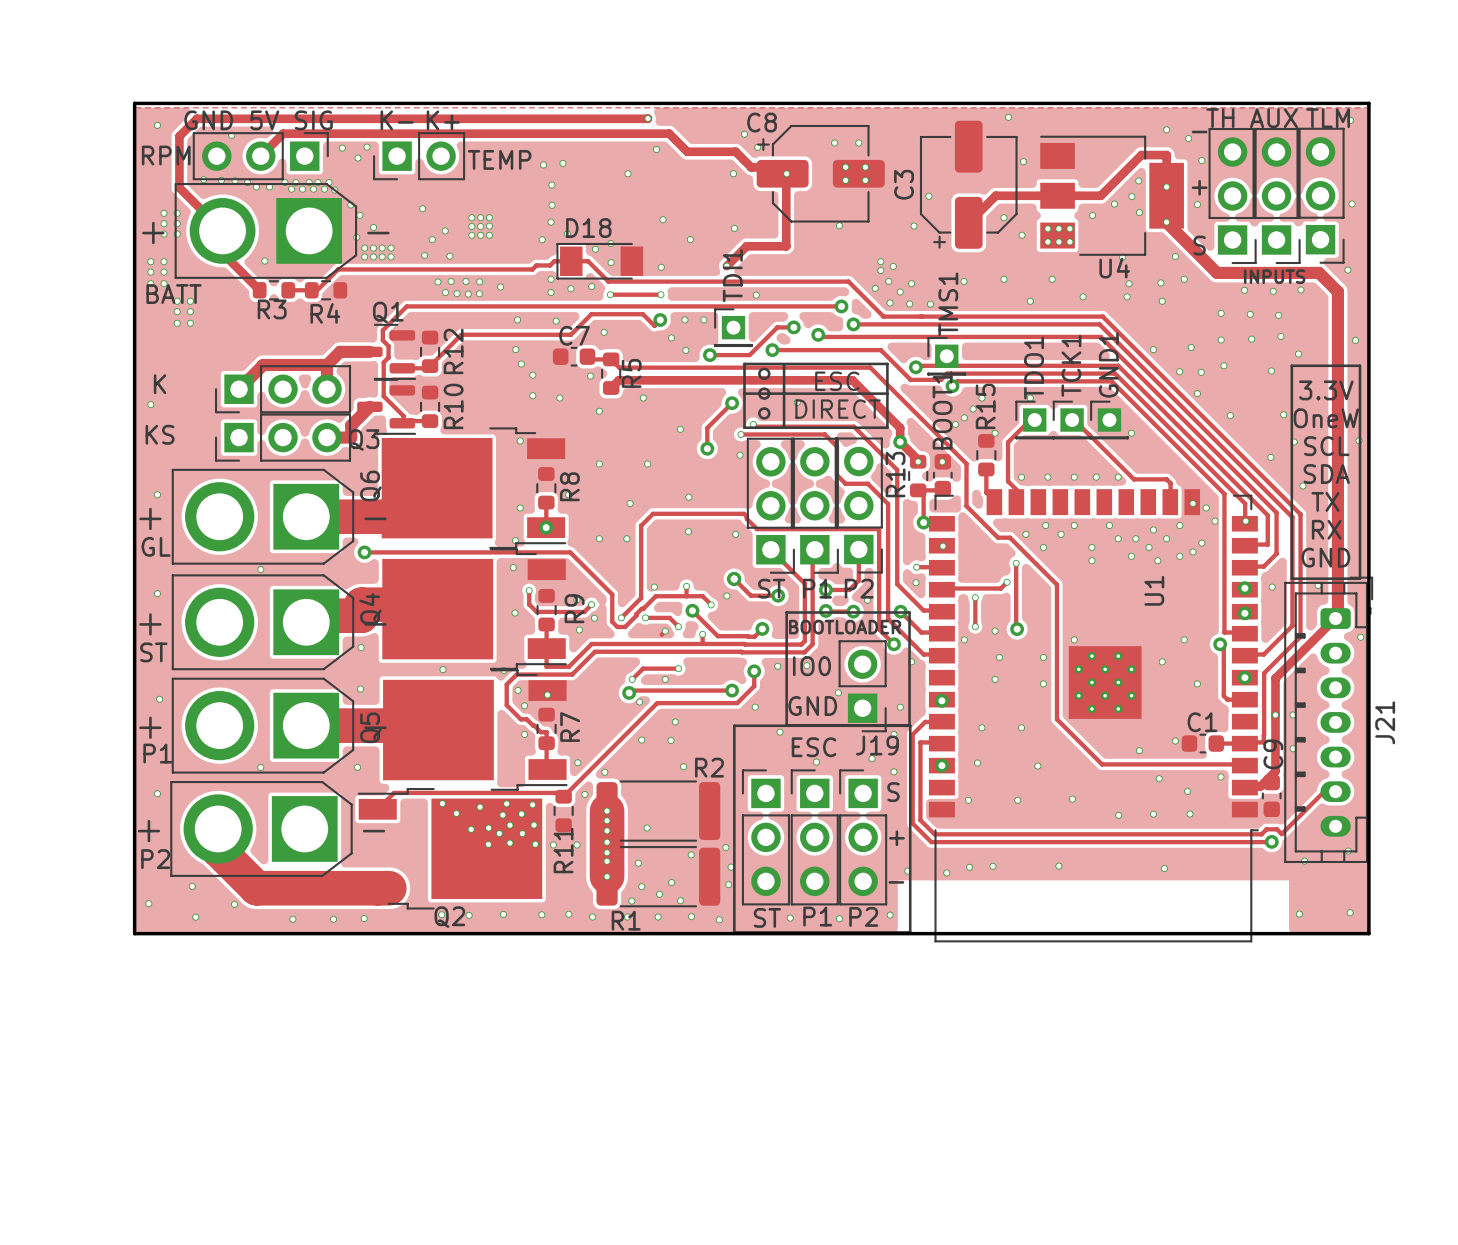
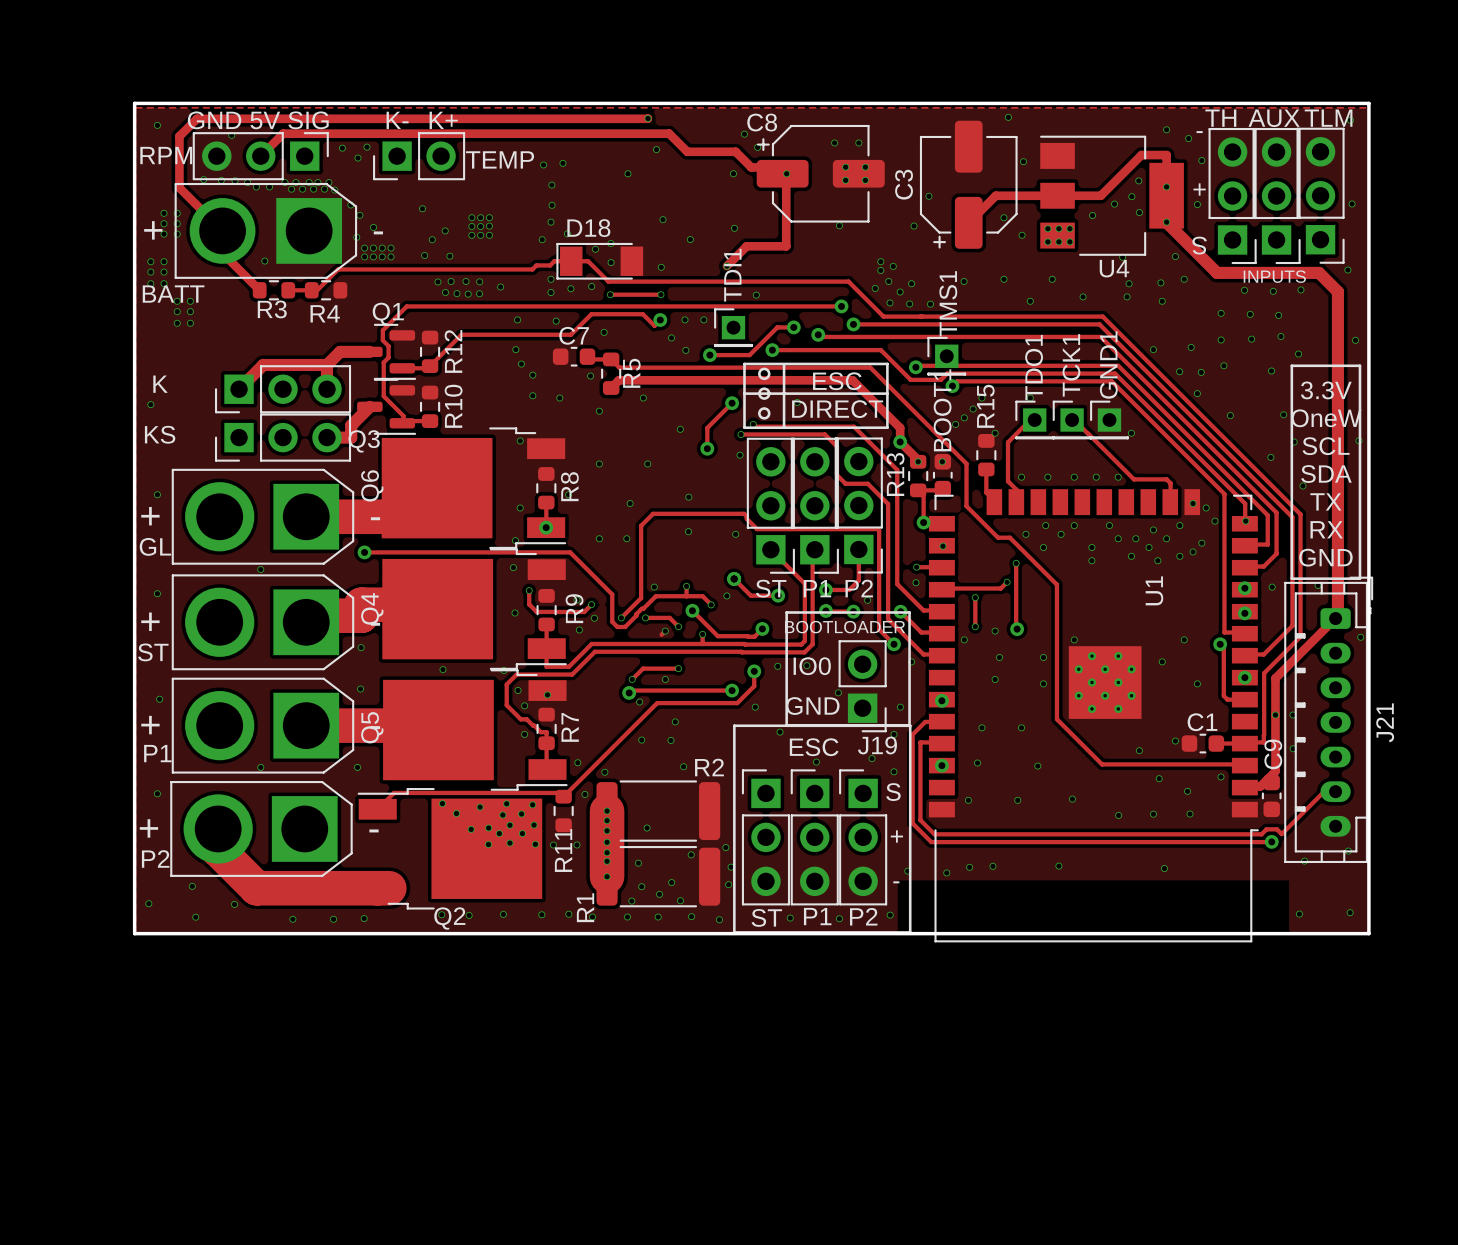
R1 name rotation: 0° (626, 920) -> 90° counterclockwise (585, 907)

